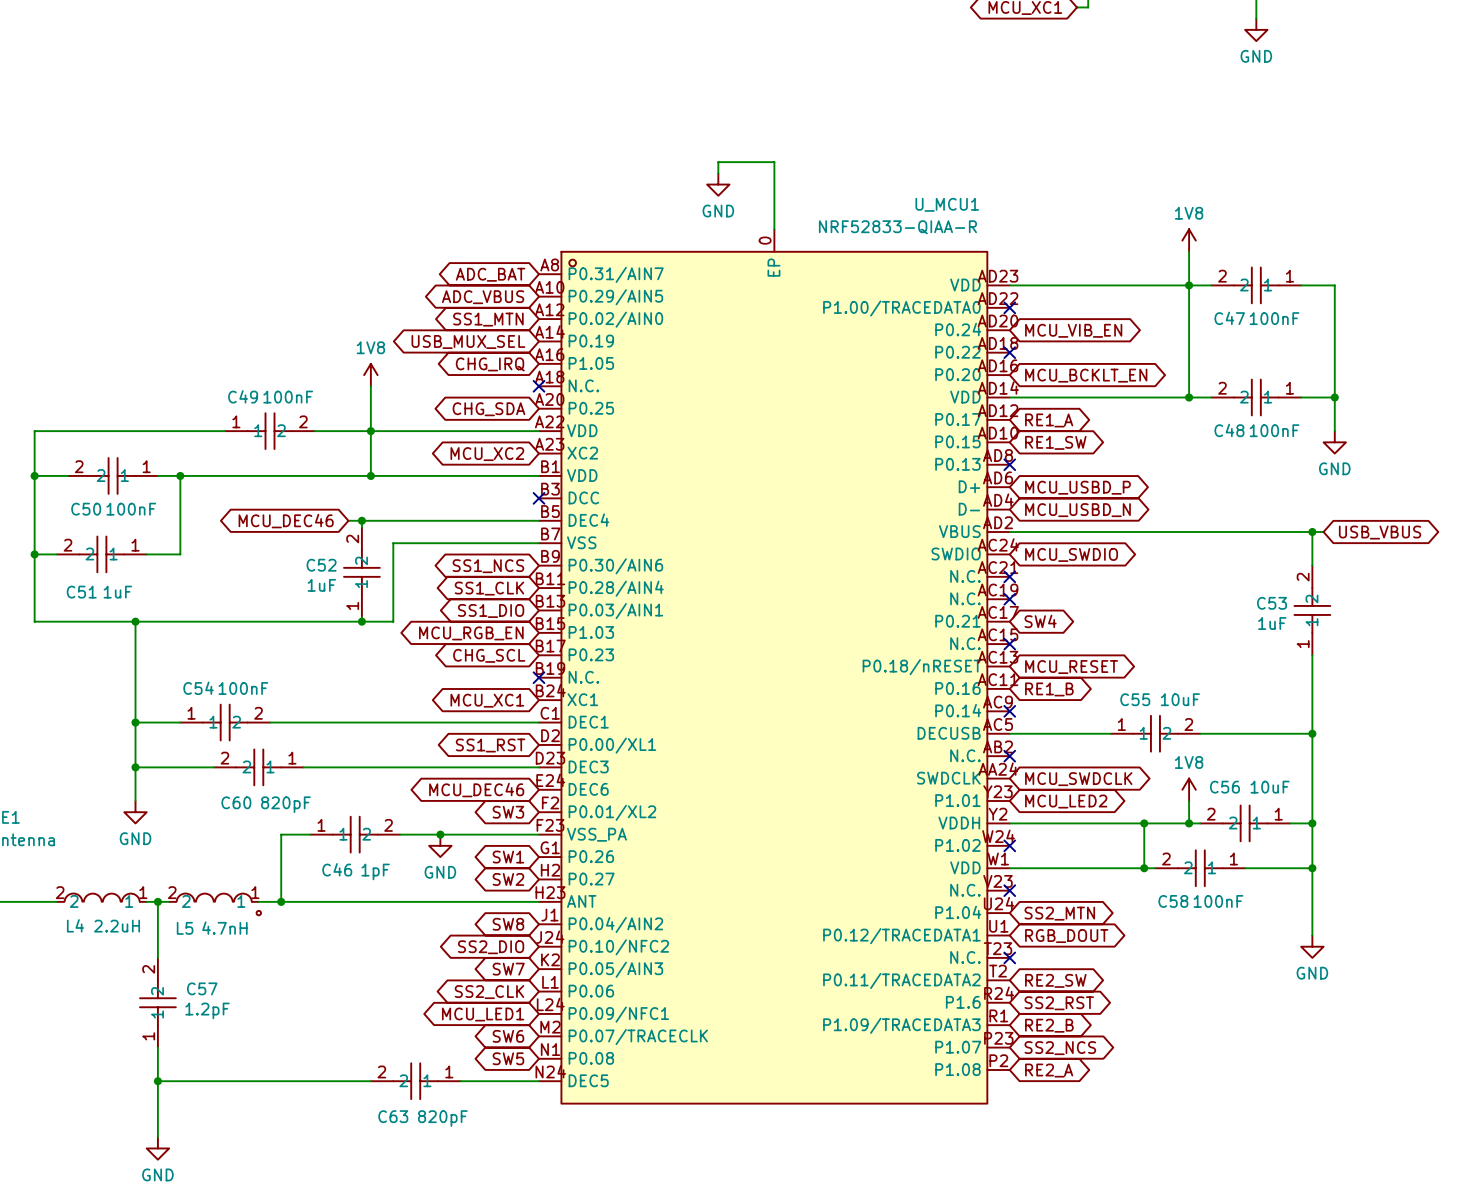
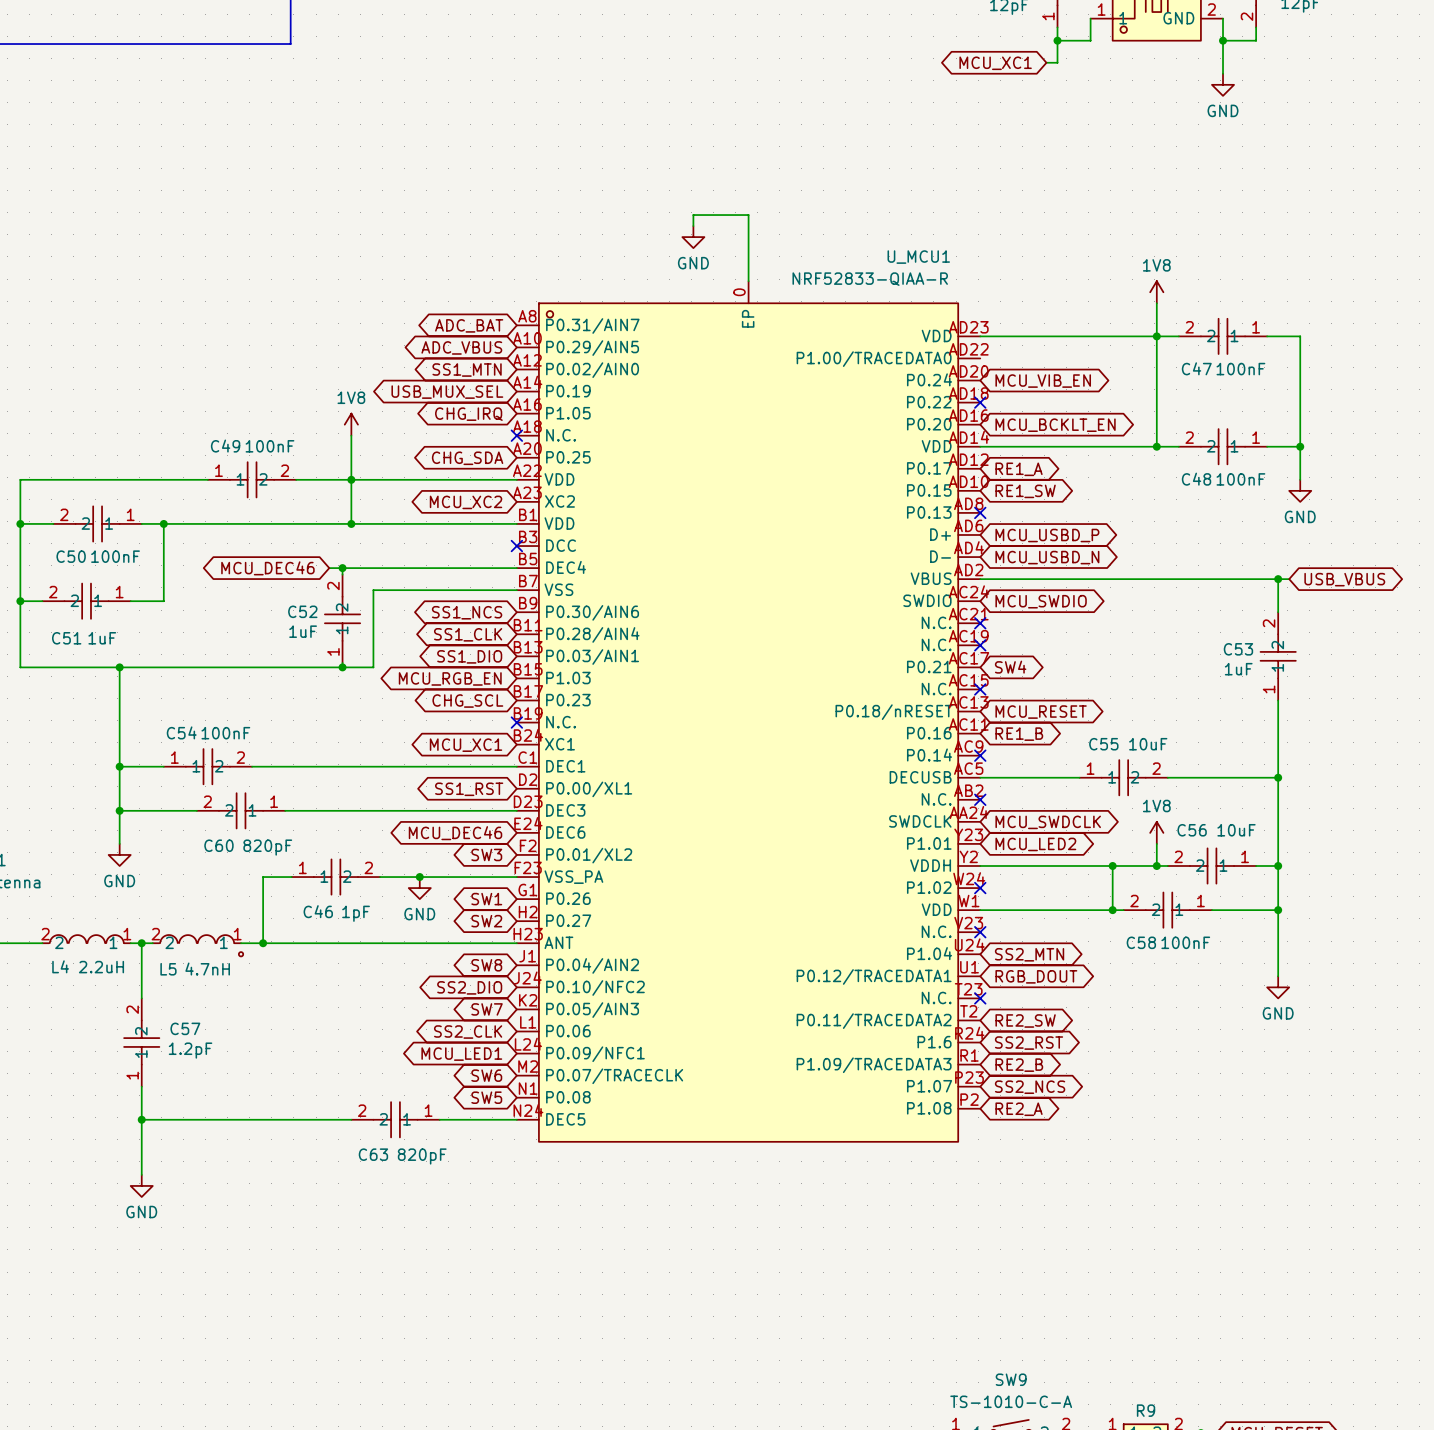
no-connect mark: (1009, 307) -> none

